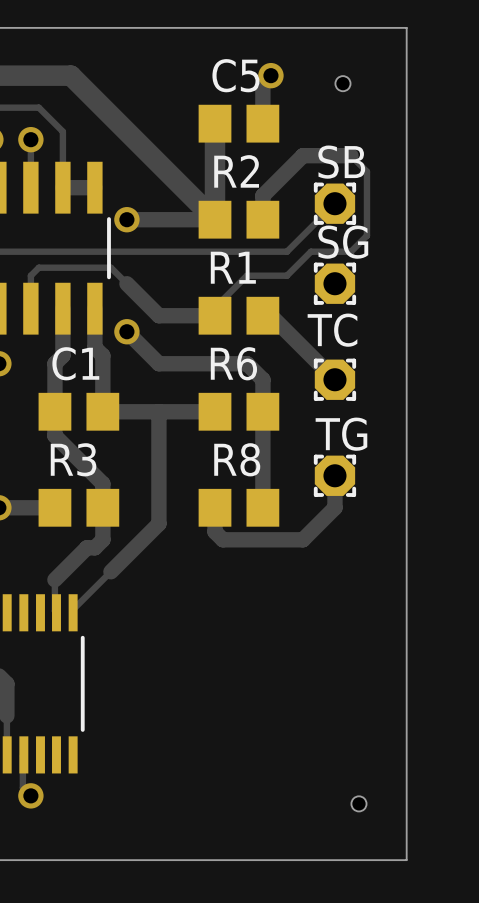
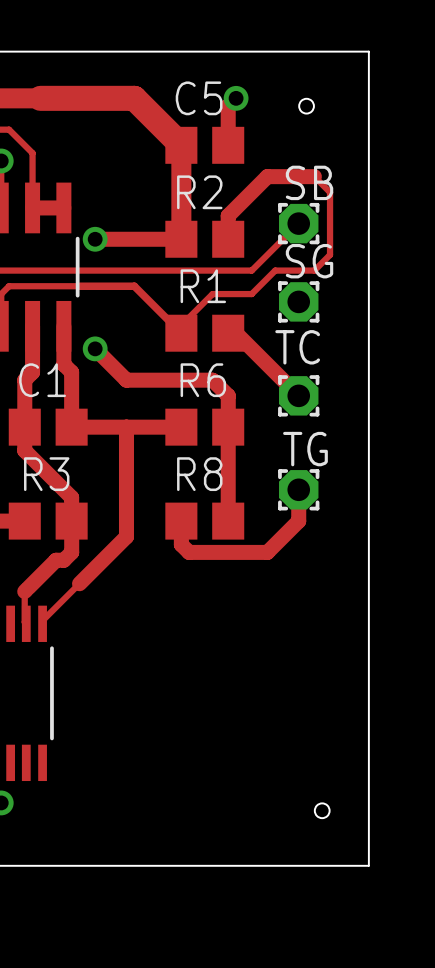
track: (70, 75) (215, 219) -> (40, 98) (134, 98) (181, 145)
track: (110, 267) (158, 315) (215, 315) -> (79, 286) (134, 286) (181, 333)

